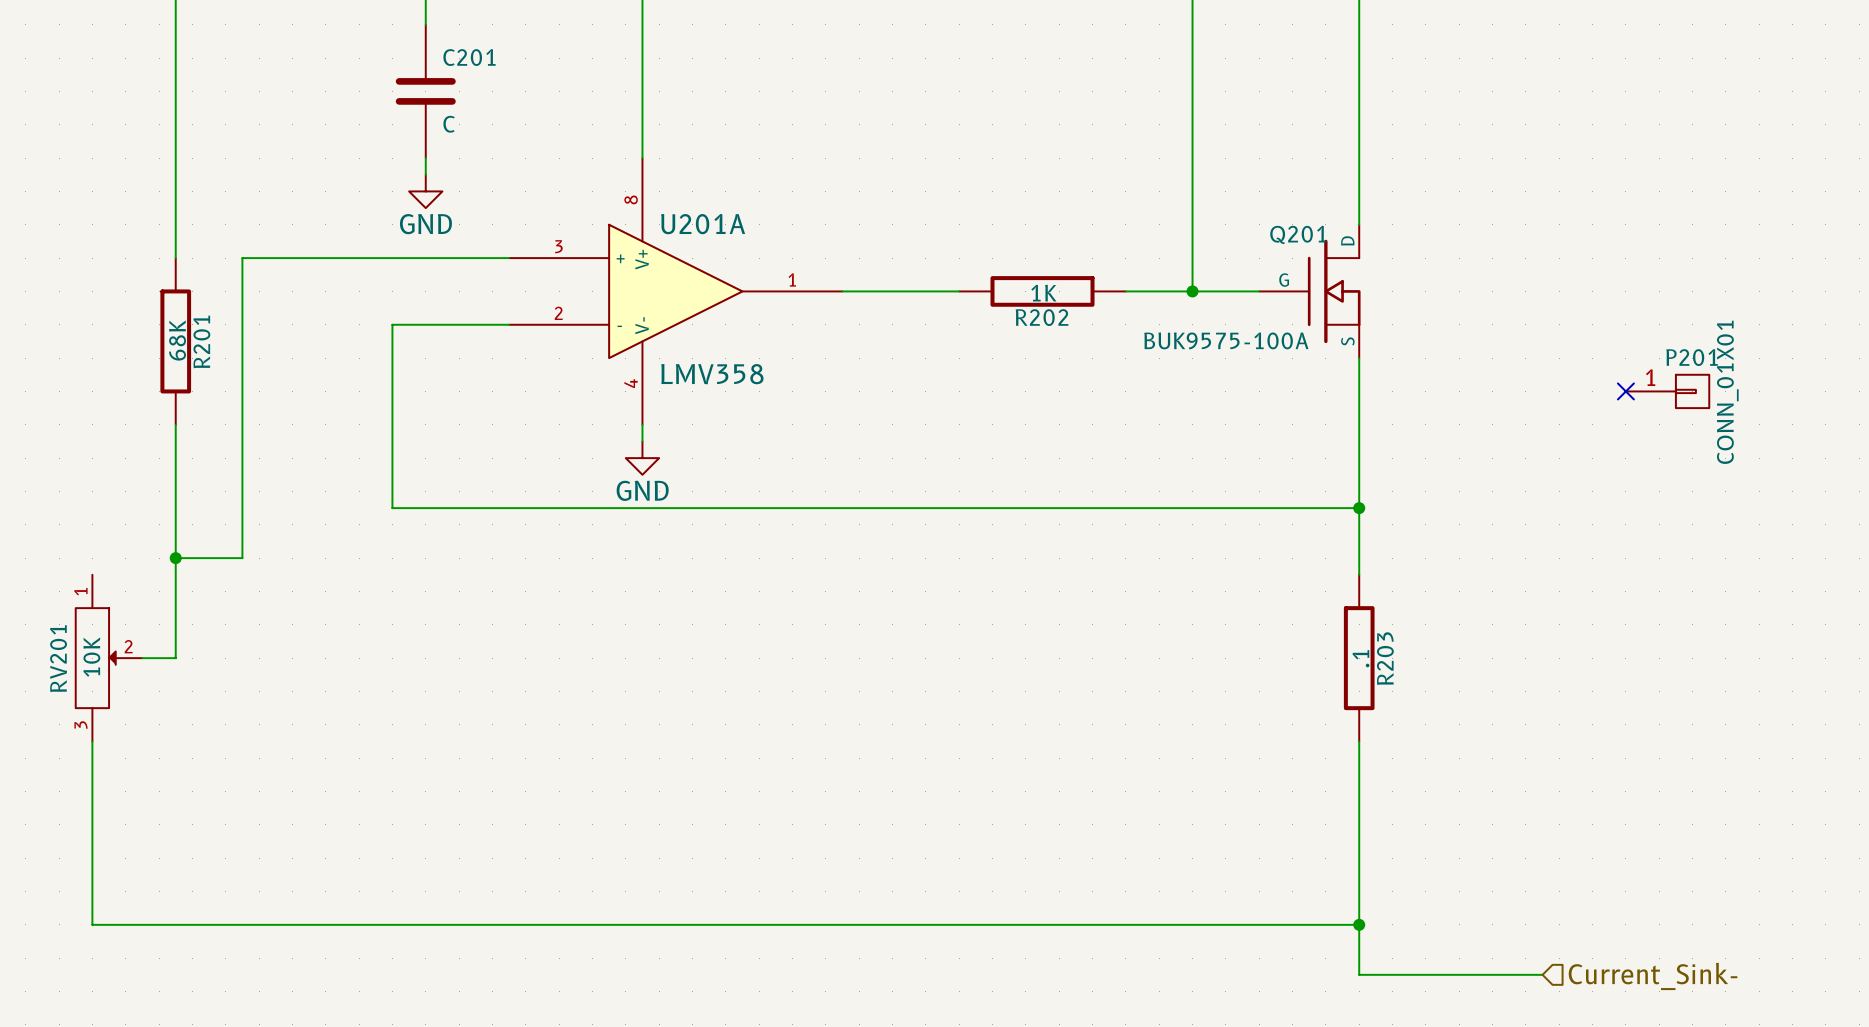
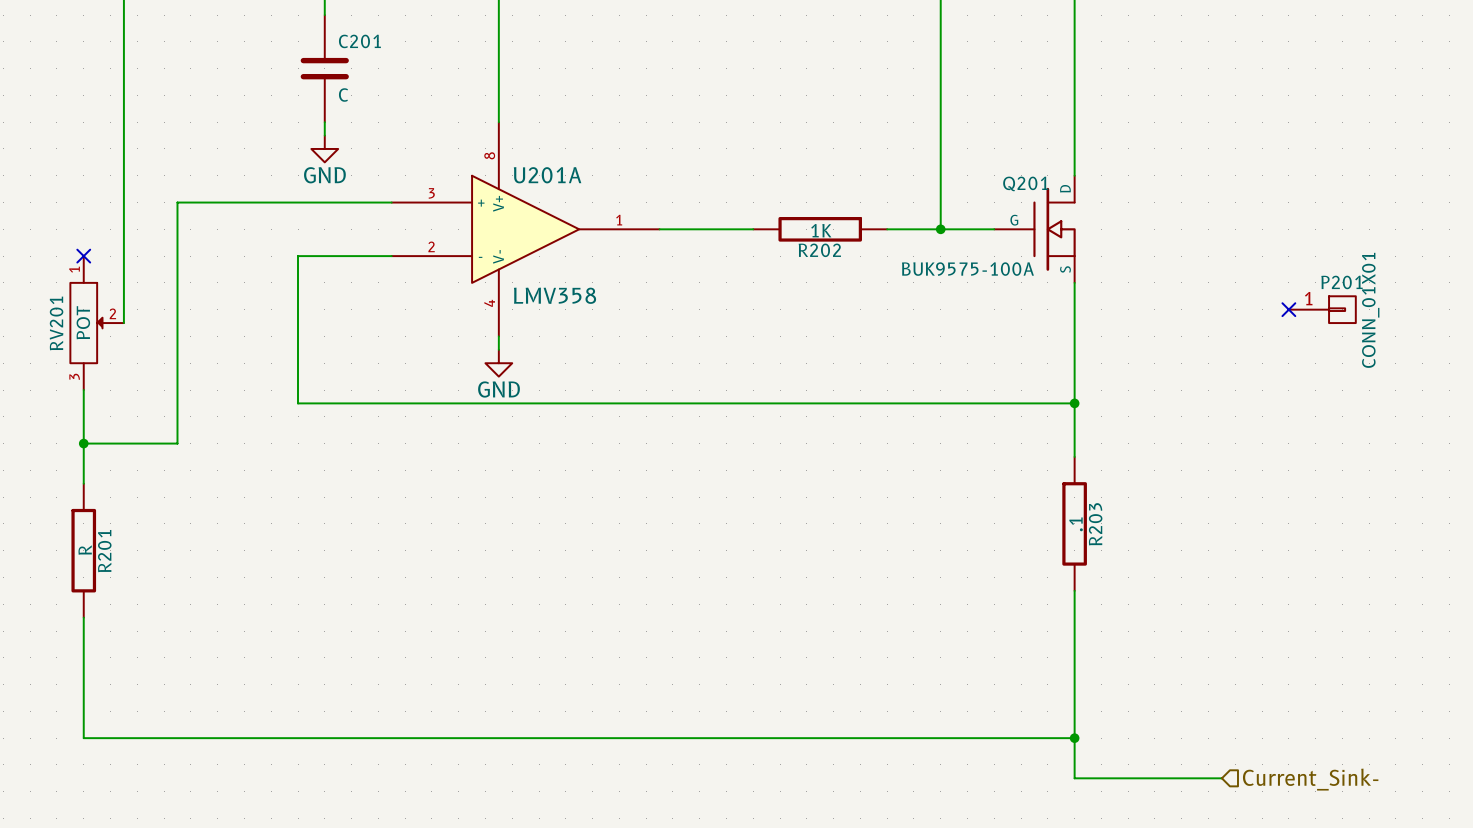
wire: none -> (123, 202) (123, 323)
no-connect mark: none -> (83, 256)
R201 value: 68K (177, 340) -> R (85, 550)
R201 position: (175, 341) -> (83, 550)
wire: (175, 424) (175, 658) (142, 658) -> none
wire: none -> (83, 390) (83, 483)
wire: none -> (83, 443) (123, 443)
junction position: (175, 558) -> (83, 443)
RV201 value: 10K (91, 657) -> POT (83, 322)
RV201 position: (109, 658) -> (97, 323)
wire: (92, 741) (92, 924) (125, 924) -> (83, 617) (83, 738)

